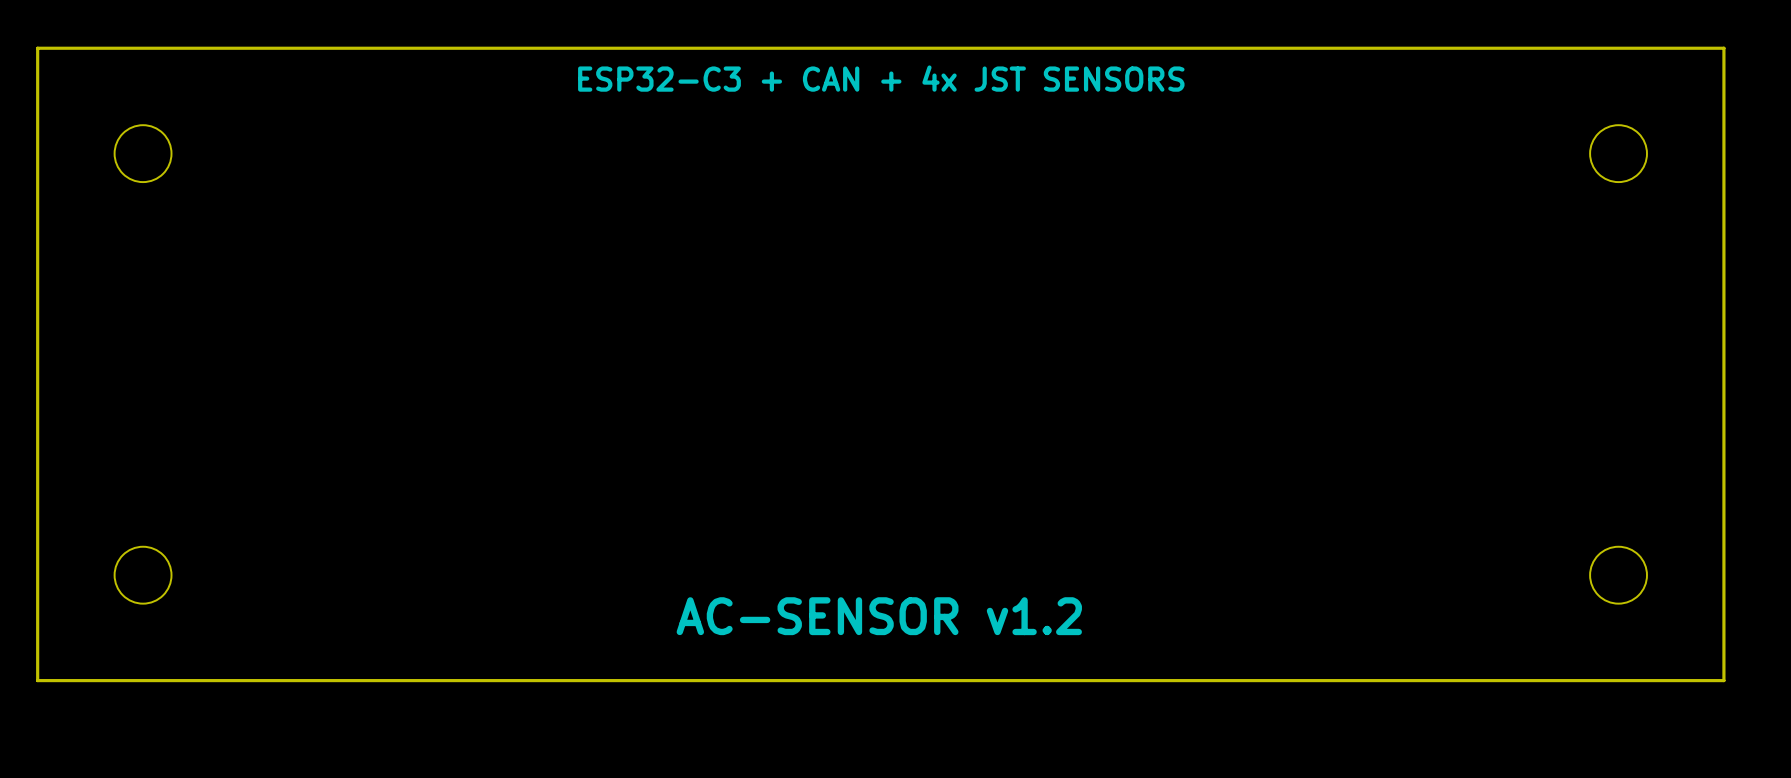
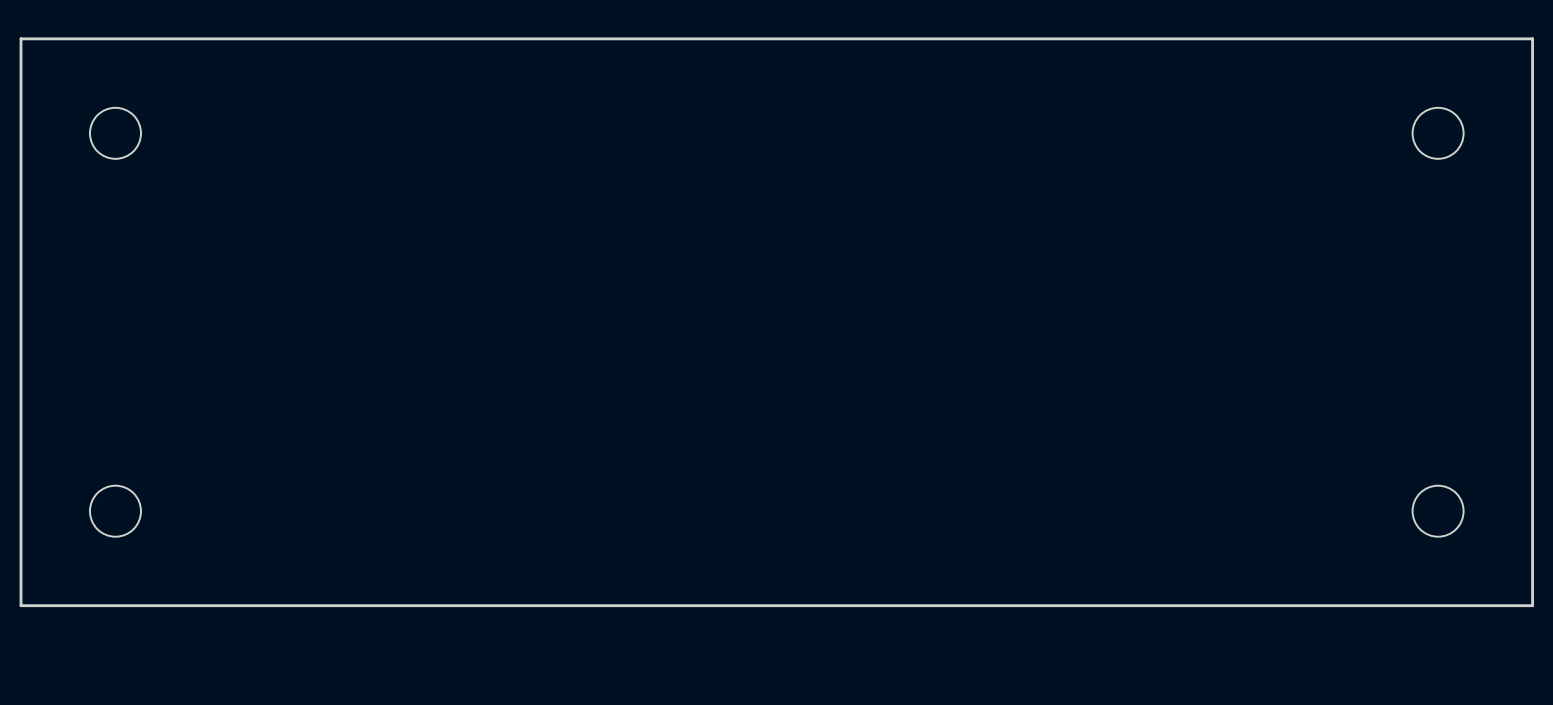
text: ESP32-C3 + CAN + 4x JST SENSORS (881, 78) -> none
text: AC-SENSOR v1.2 (879, 616) -> none

